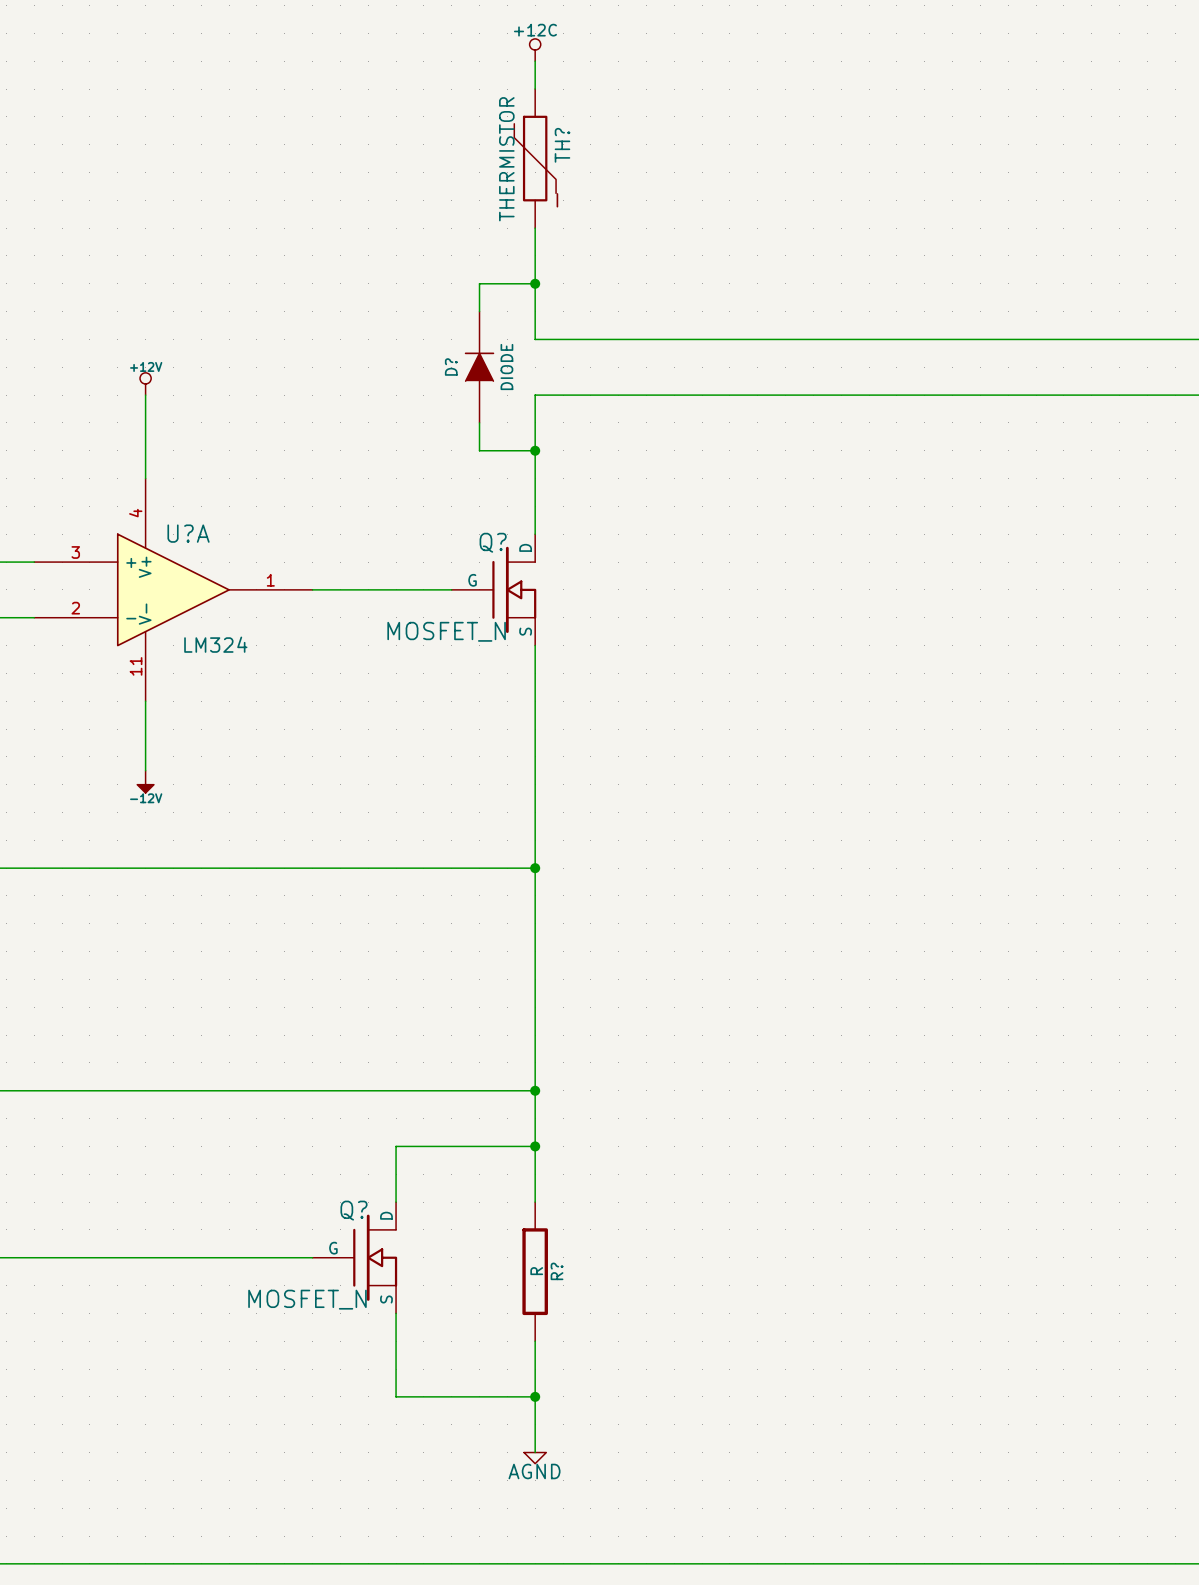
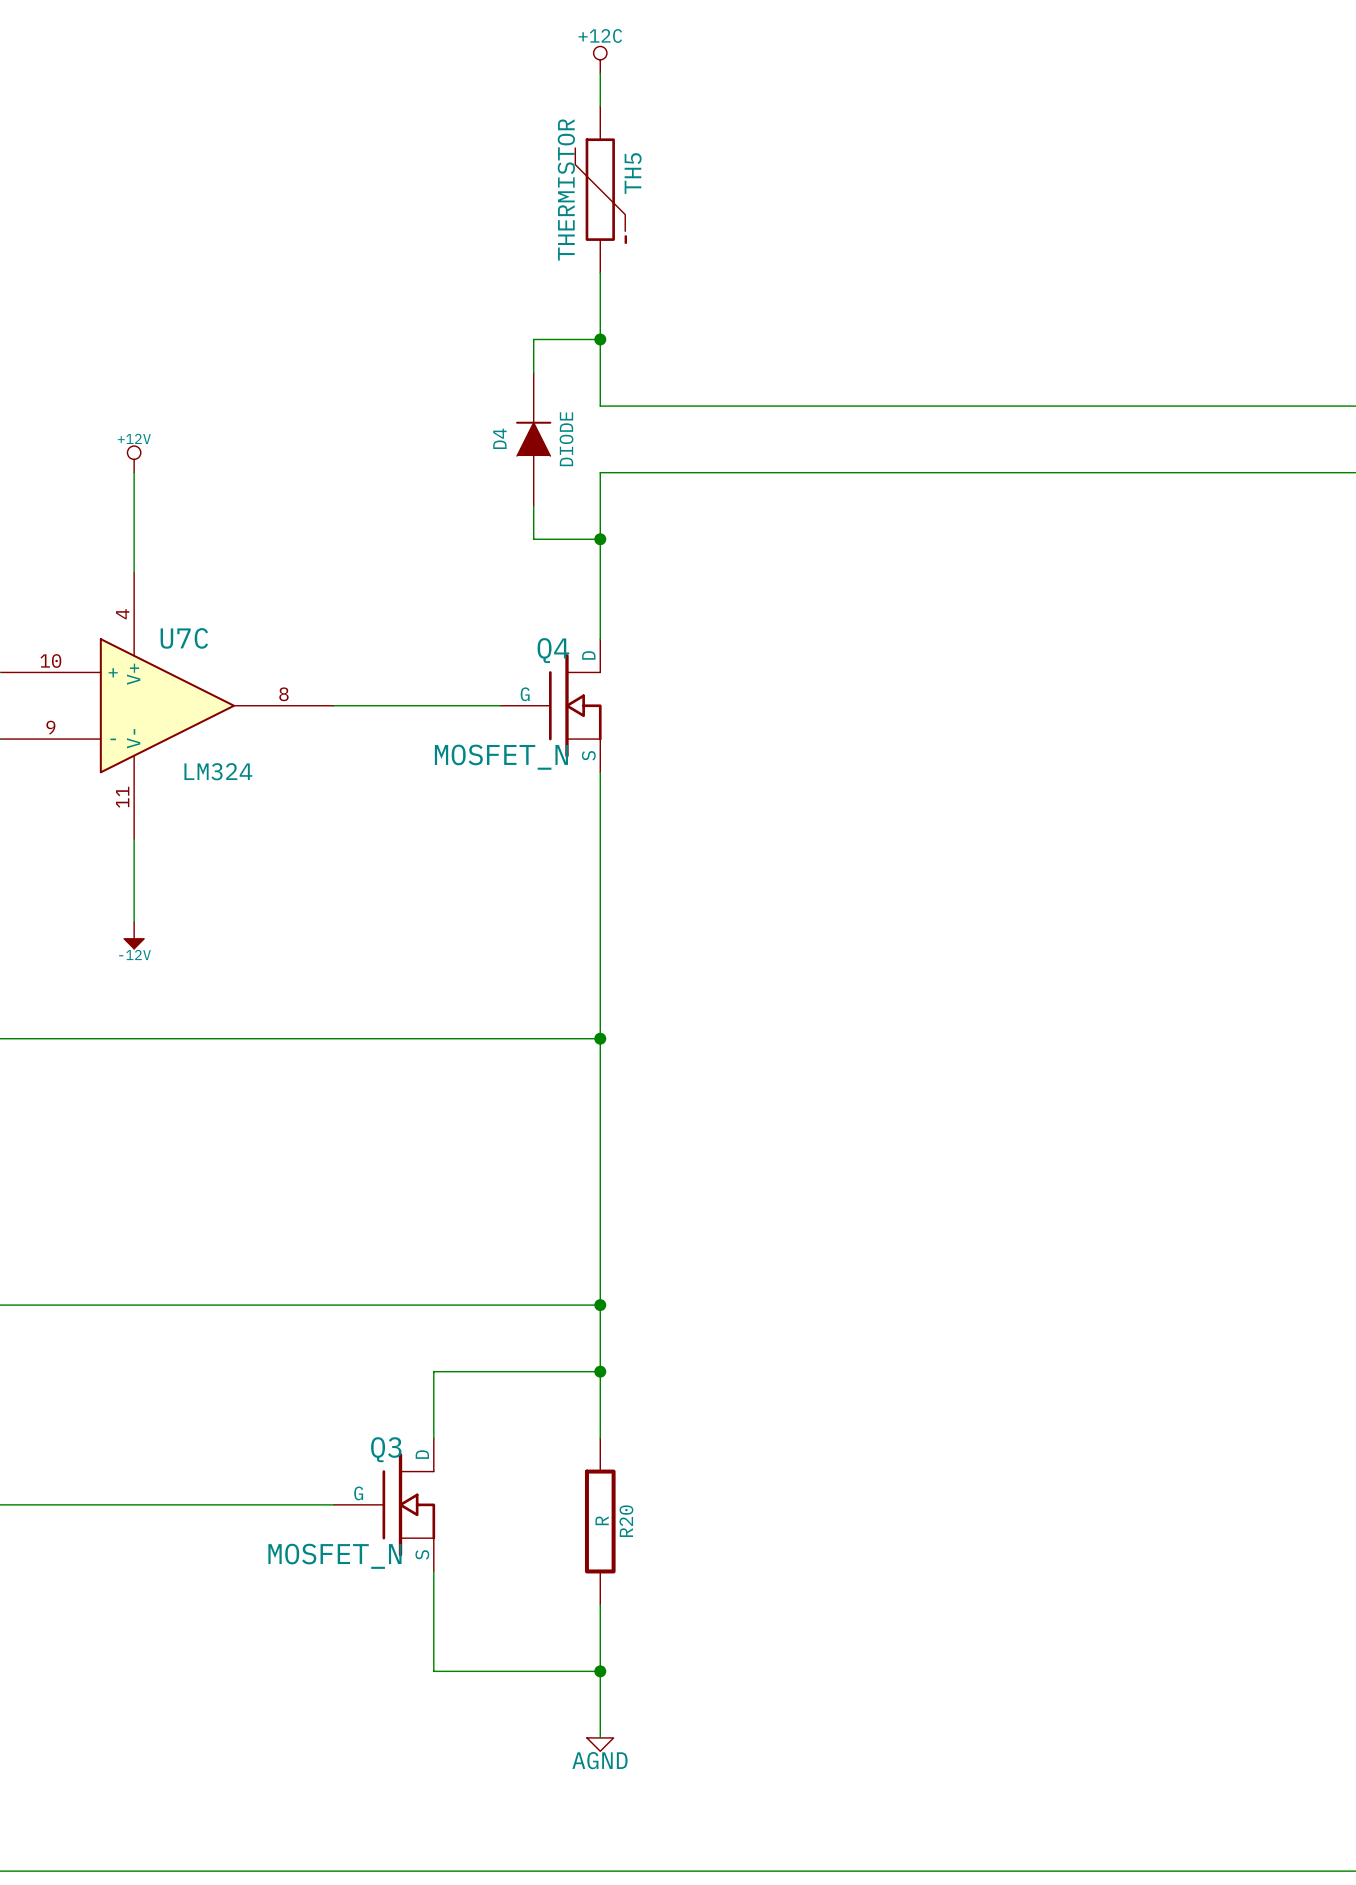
TH? name: TH? (562, 145) -> TH5 (633, 173)
D? name: D? (451, 367) -> D4 (499, 438)
U?A name: U?A (188, 533) -> U7C (184, 638)
Q? name: Q? (493, 542) -> Q4 (553, 650)
U?A pin number: 3 (75, 552) -> 10 (50, 661)
U?A pin number: 1 (270, 580) -> 8 (283, 694)
U?A pin number: 2 (75, 608) -> 9 (50, 727)
Q? name: Q? (353, 1210) -> Q3 (386, 1449)
R? name: R? (557, 1271) -> R20 (626, 1521)

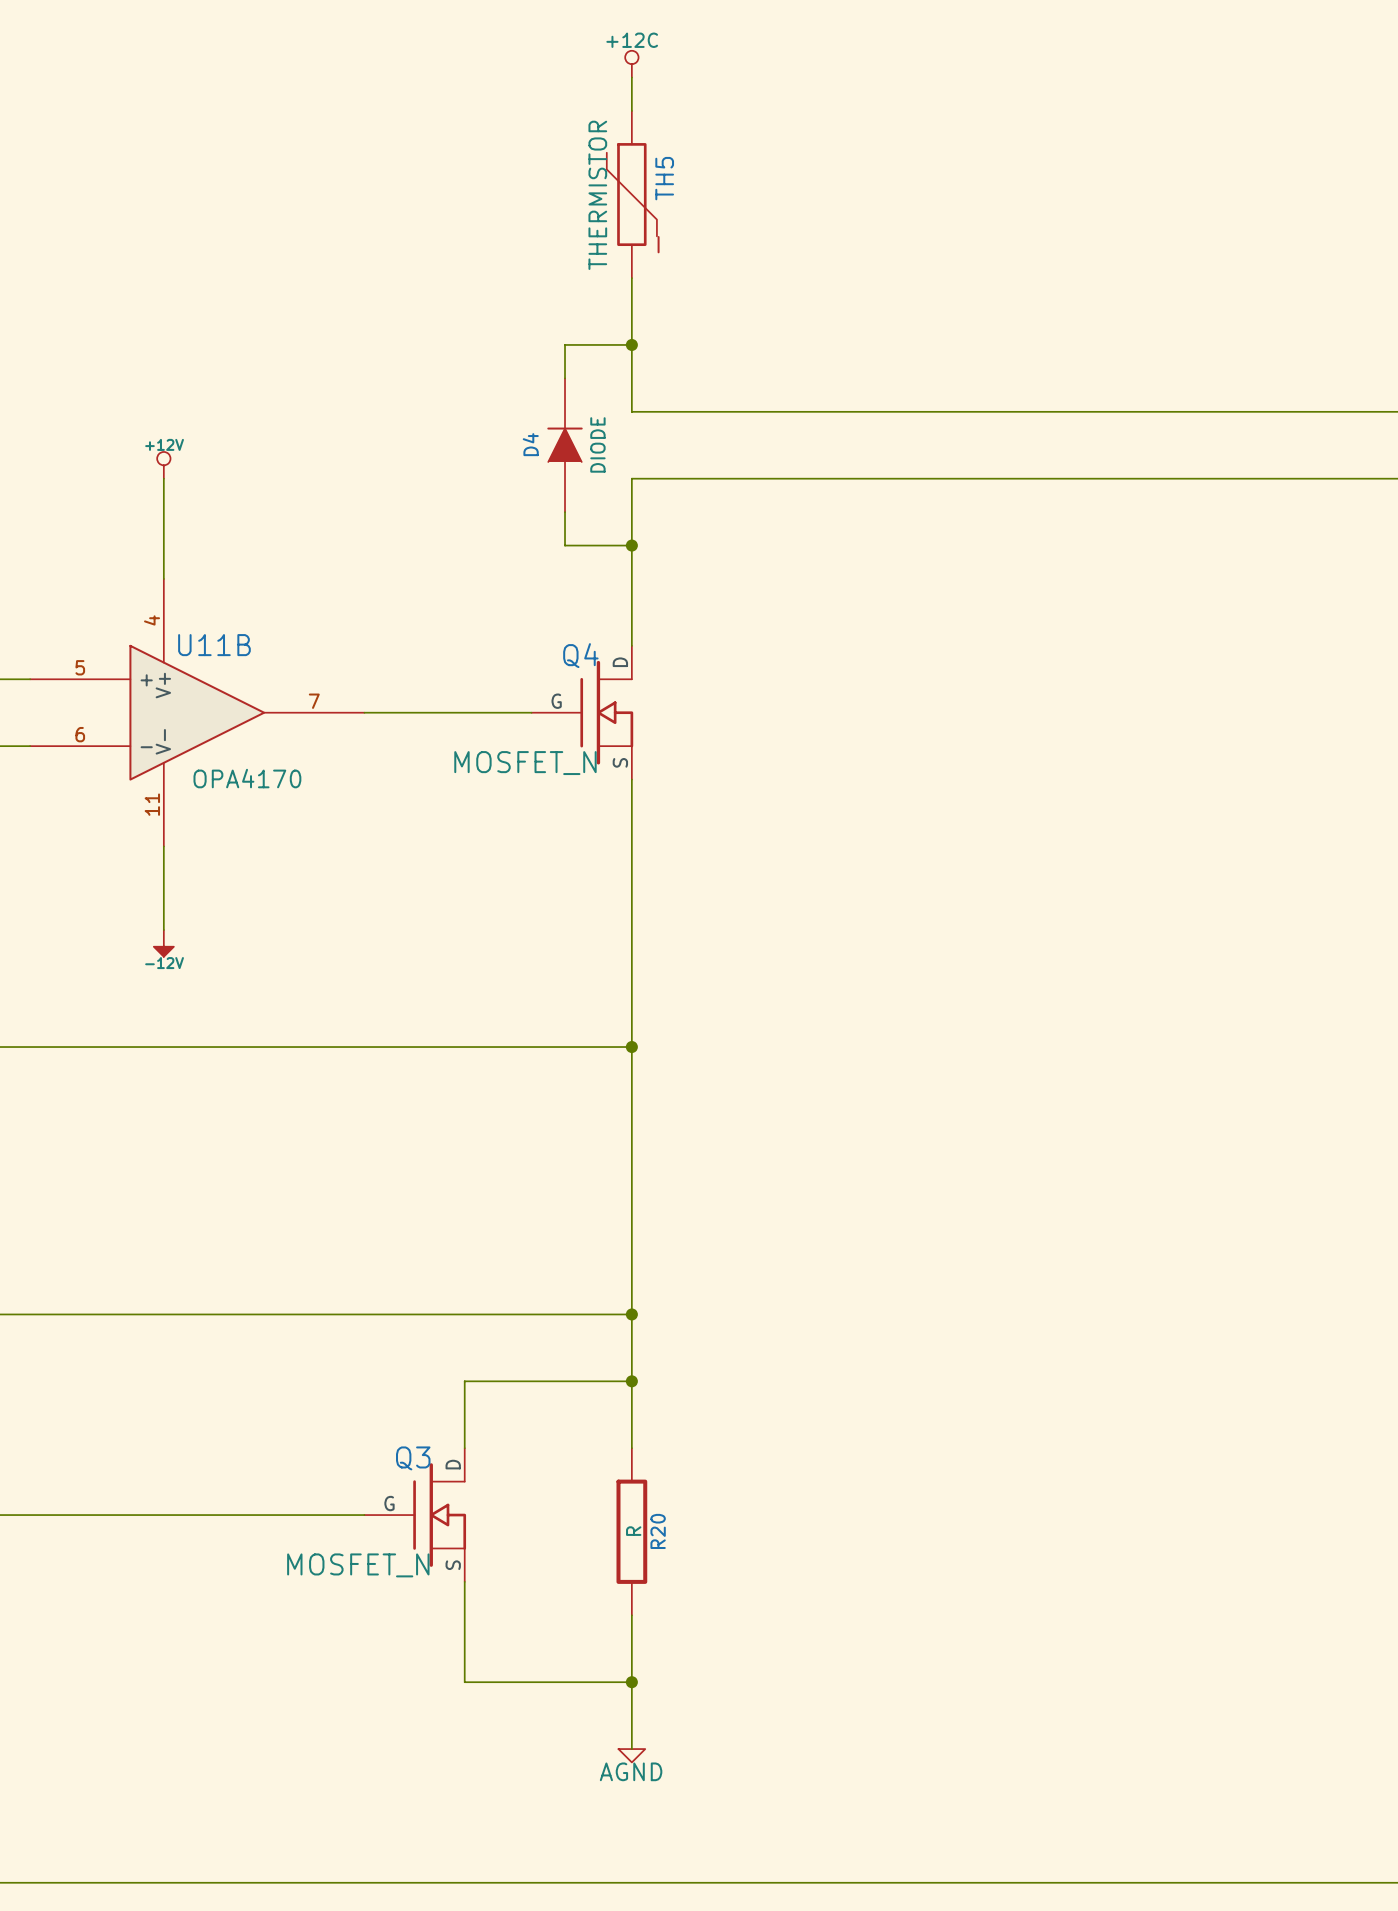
U7C name: U7C (184, 638) -> U11B (214, 645)
U7C pin number: 10 (50, 661) -> 5 (80, 667)
U7C pin number: 8 (283, 694) -> 7 (314, 701)
U7C pin number: 9 (50, 727) -> 6 (80, 734)
U7C value: LM324 (218, 771) -> OPA4170 (247, 778)

